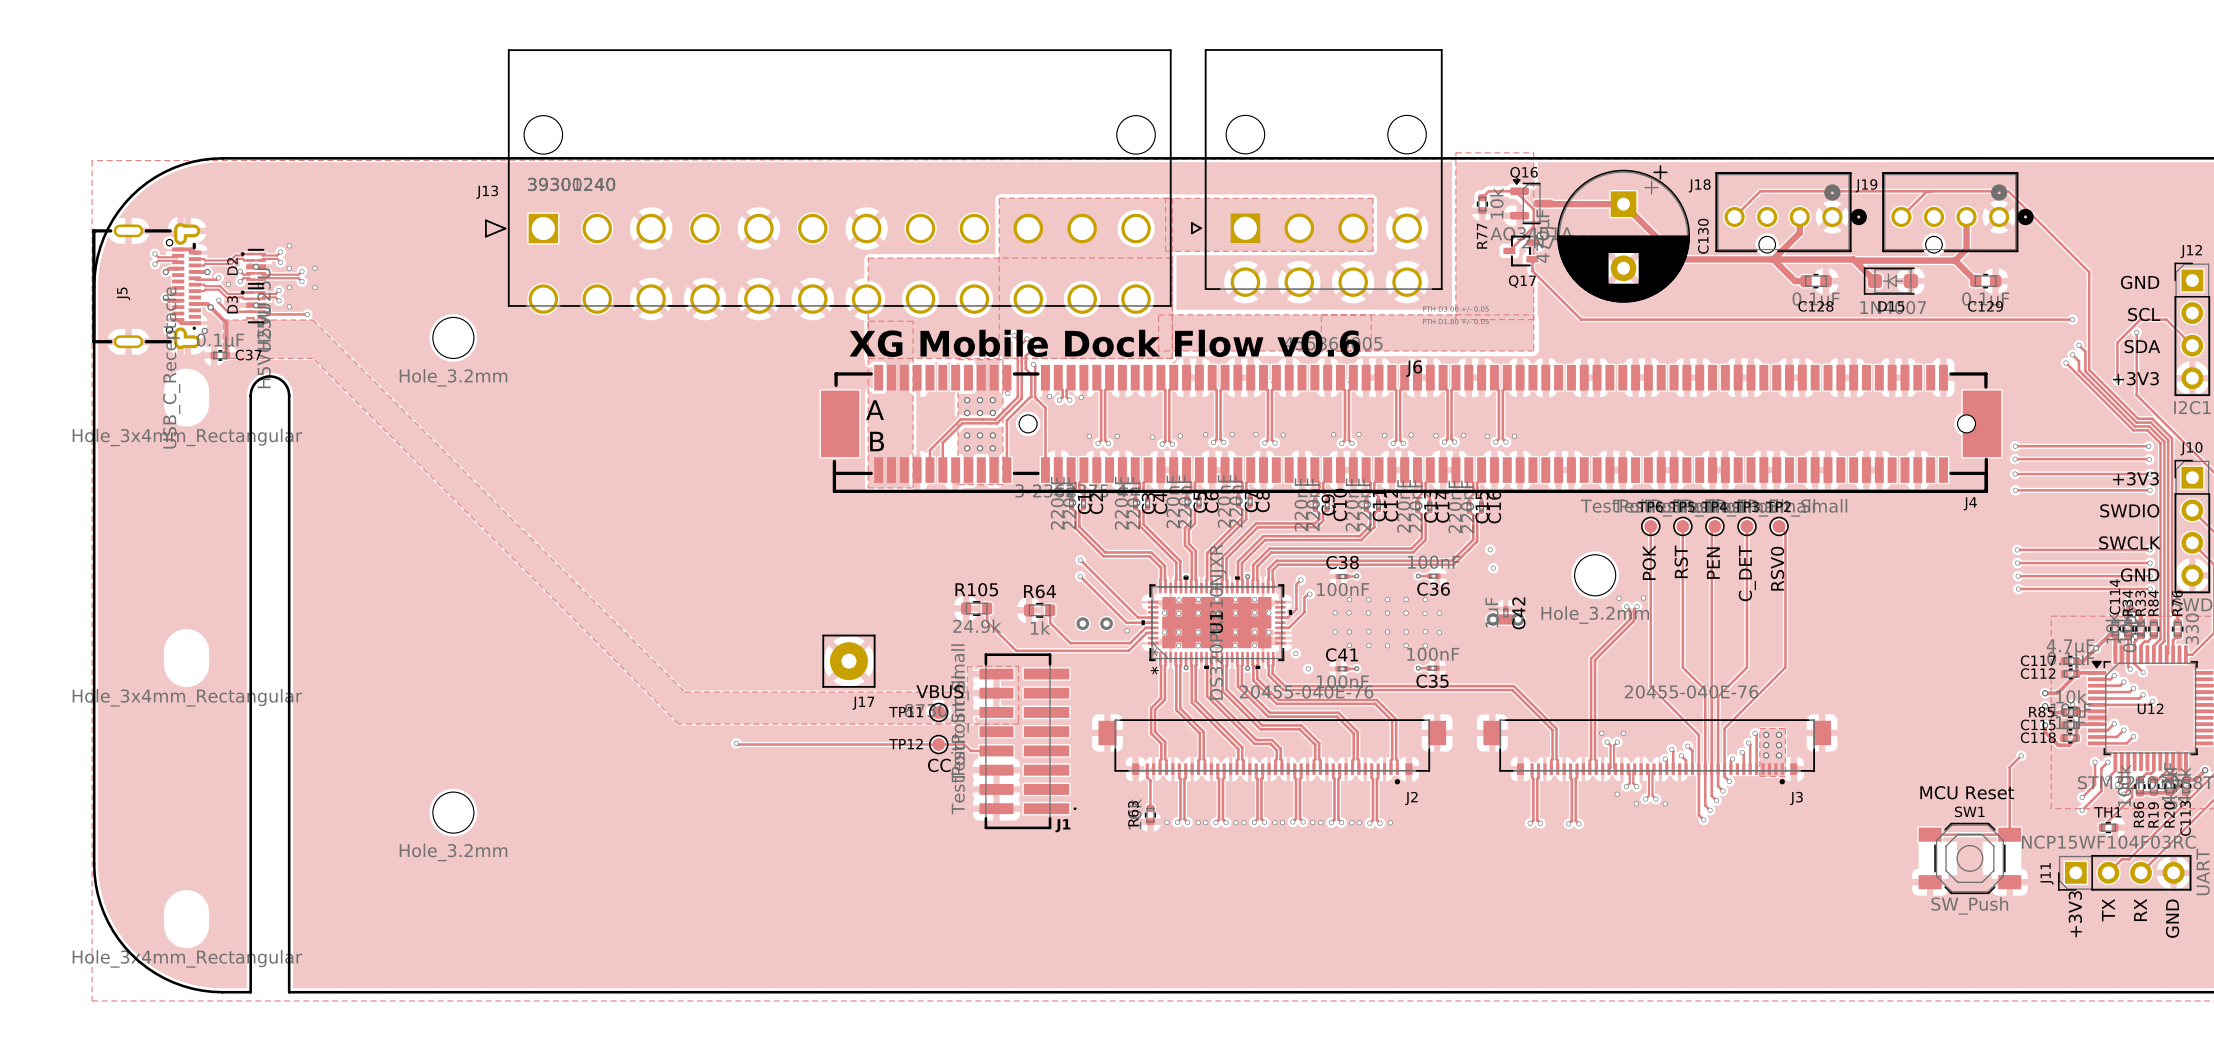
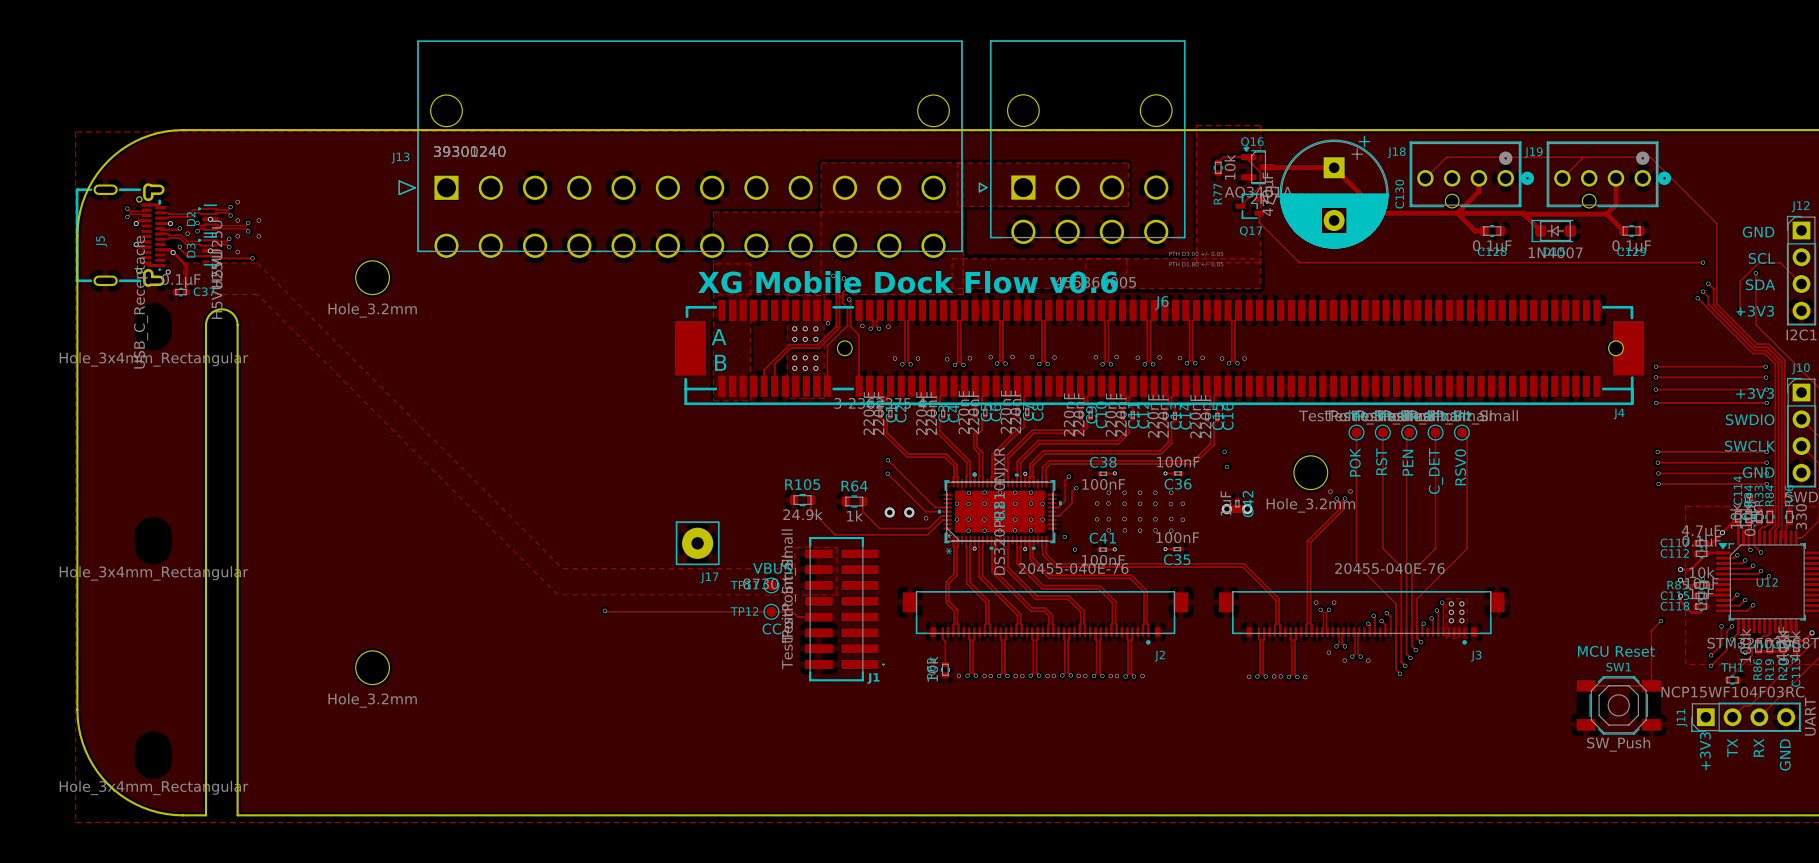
via: none -> (1249, 676)
via: none -> (1274, 676)
via: none -> (1280, 676)
via: none -> (1305, 677)

